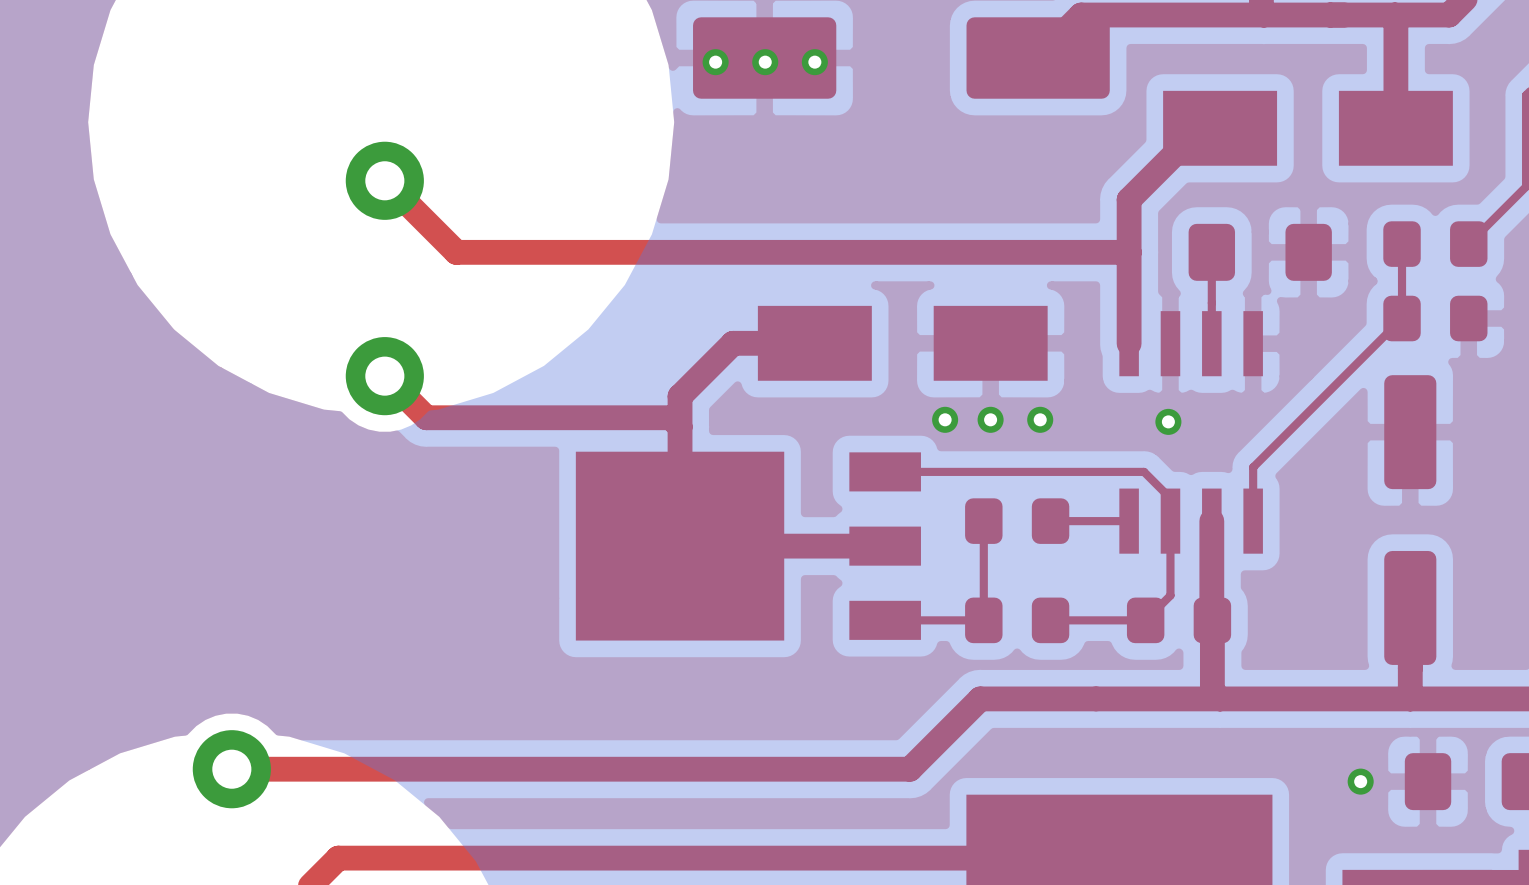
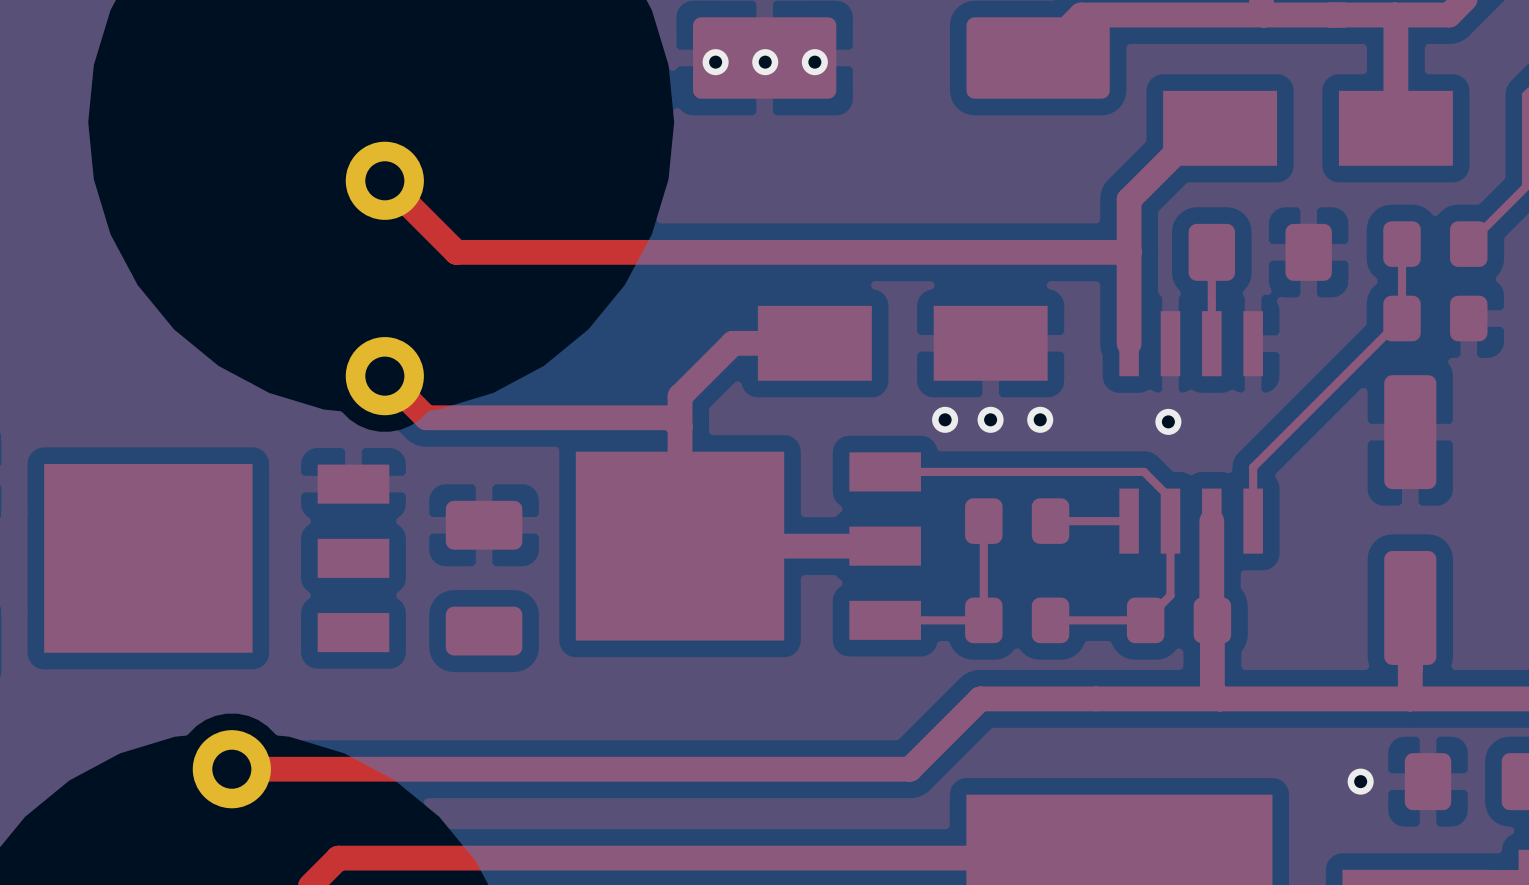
part: none -> (216, 558)
part: none -> (484, 578)

